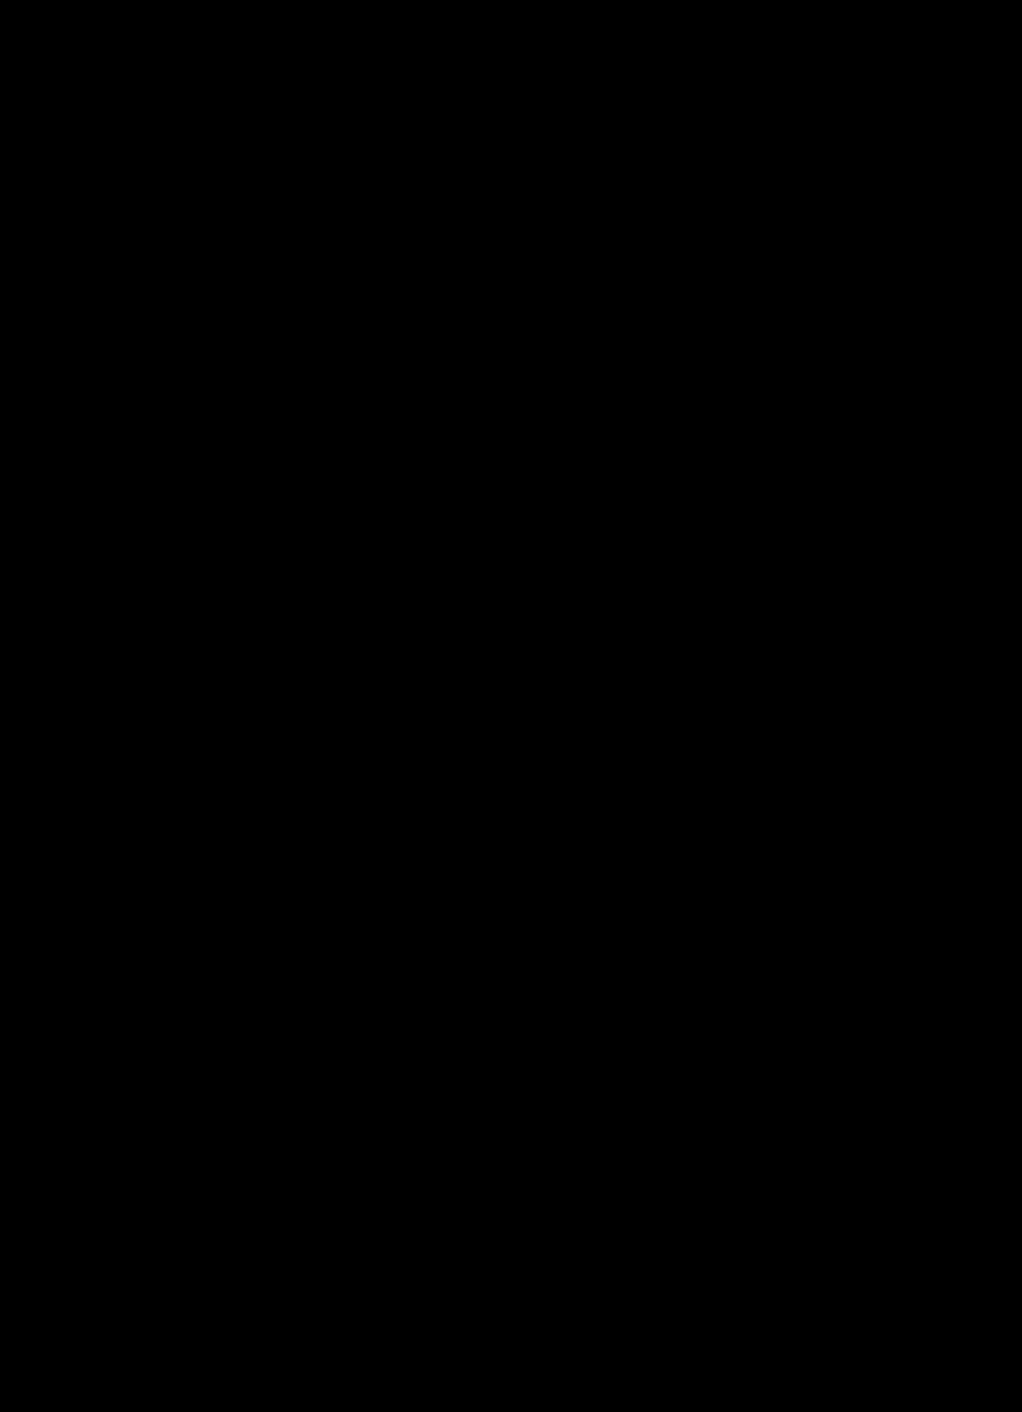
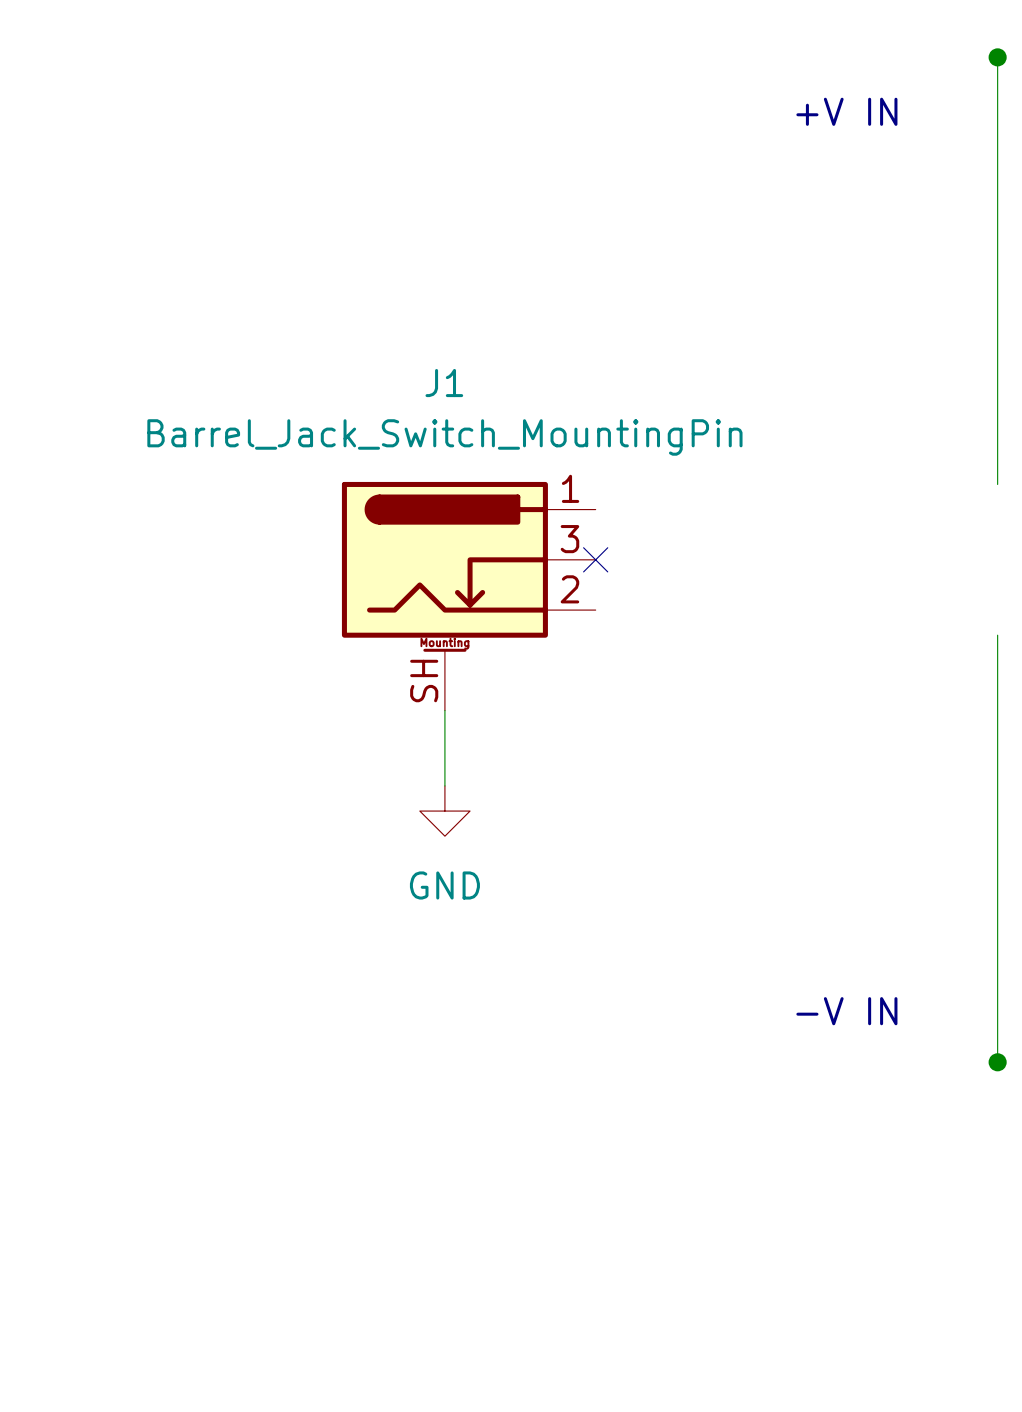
wire: none -> (997, 57) (997, 484)
junction: none -> (997, 57)
text: none -> +V IN (846, 111)
no-connect mark: none -> (595, 559)
J1: none -> Barrel_Jack_Switch_MountingPin (468, 596)
wire: none -> (997, 635) (997, 1062)
wire: none -> (444, 710) (444, 785)
power symbol: none -> GND (444, 811)
text: none -> -V IN (846, 1011)
junction: none -> (997, 1062)

